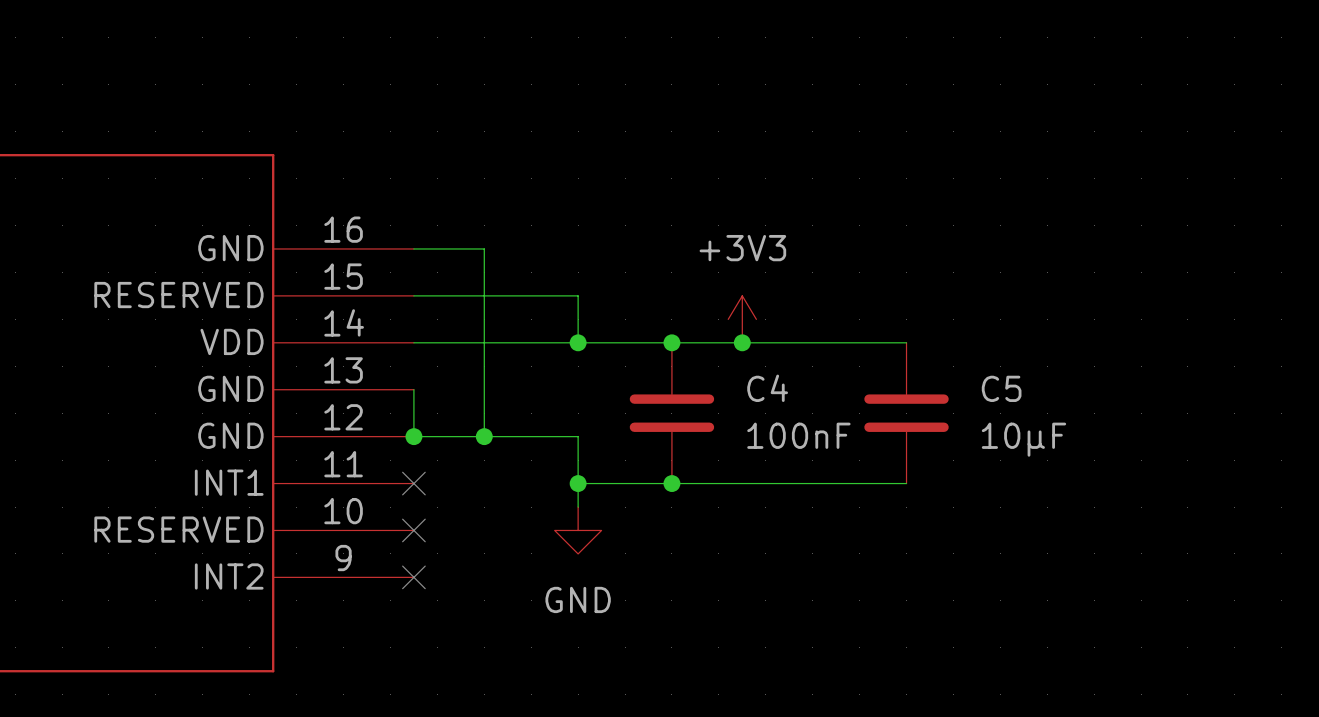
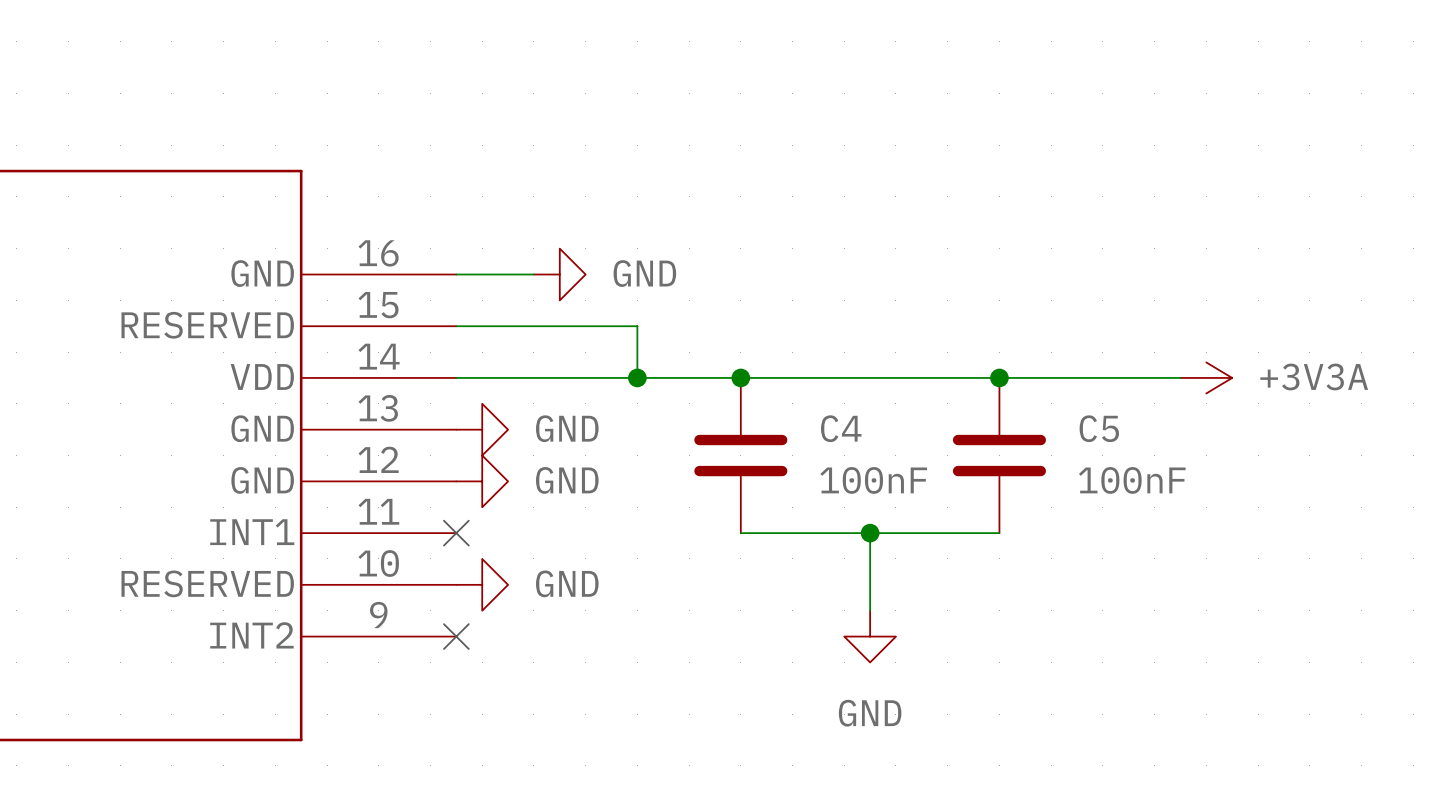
wire: (484, 248) (484, 436) -> none
power symbol: none -> GND (559, 274)
power symbol: +3V3 (742, 319) -> none
junction: (742, 342) -> none
wire: none -> (999, 377) (1180, 377)
junction: none -> (999, 377)
power symbol: none -> +3V3A (1206, 377)
wire: (413, 389) (413, 436) (578, 436) (578, 507) -> none
power symbol: none -> GND (482, 429)
junction: (413, 436) -> none
power symbol: none -> GND (482, 481)
junction: (484, 436) -> none
C5 value: 10µF (1023, 439) -> 100nF (1132, 480)
wire: (578, 483) (671, 483) -> none
junction: (578, 483) -> none
junction: (671, 483) -> none
wire: none -> (870, 533) (870, 610)
junction: none -> (870, 533)
no-connect mark: (413, 530) -> none
power symbol: none -> GND (482, 584)
power symbol: GND (578, 530) -> none
power symbol: none -> GND (870, 636)

